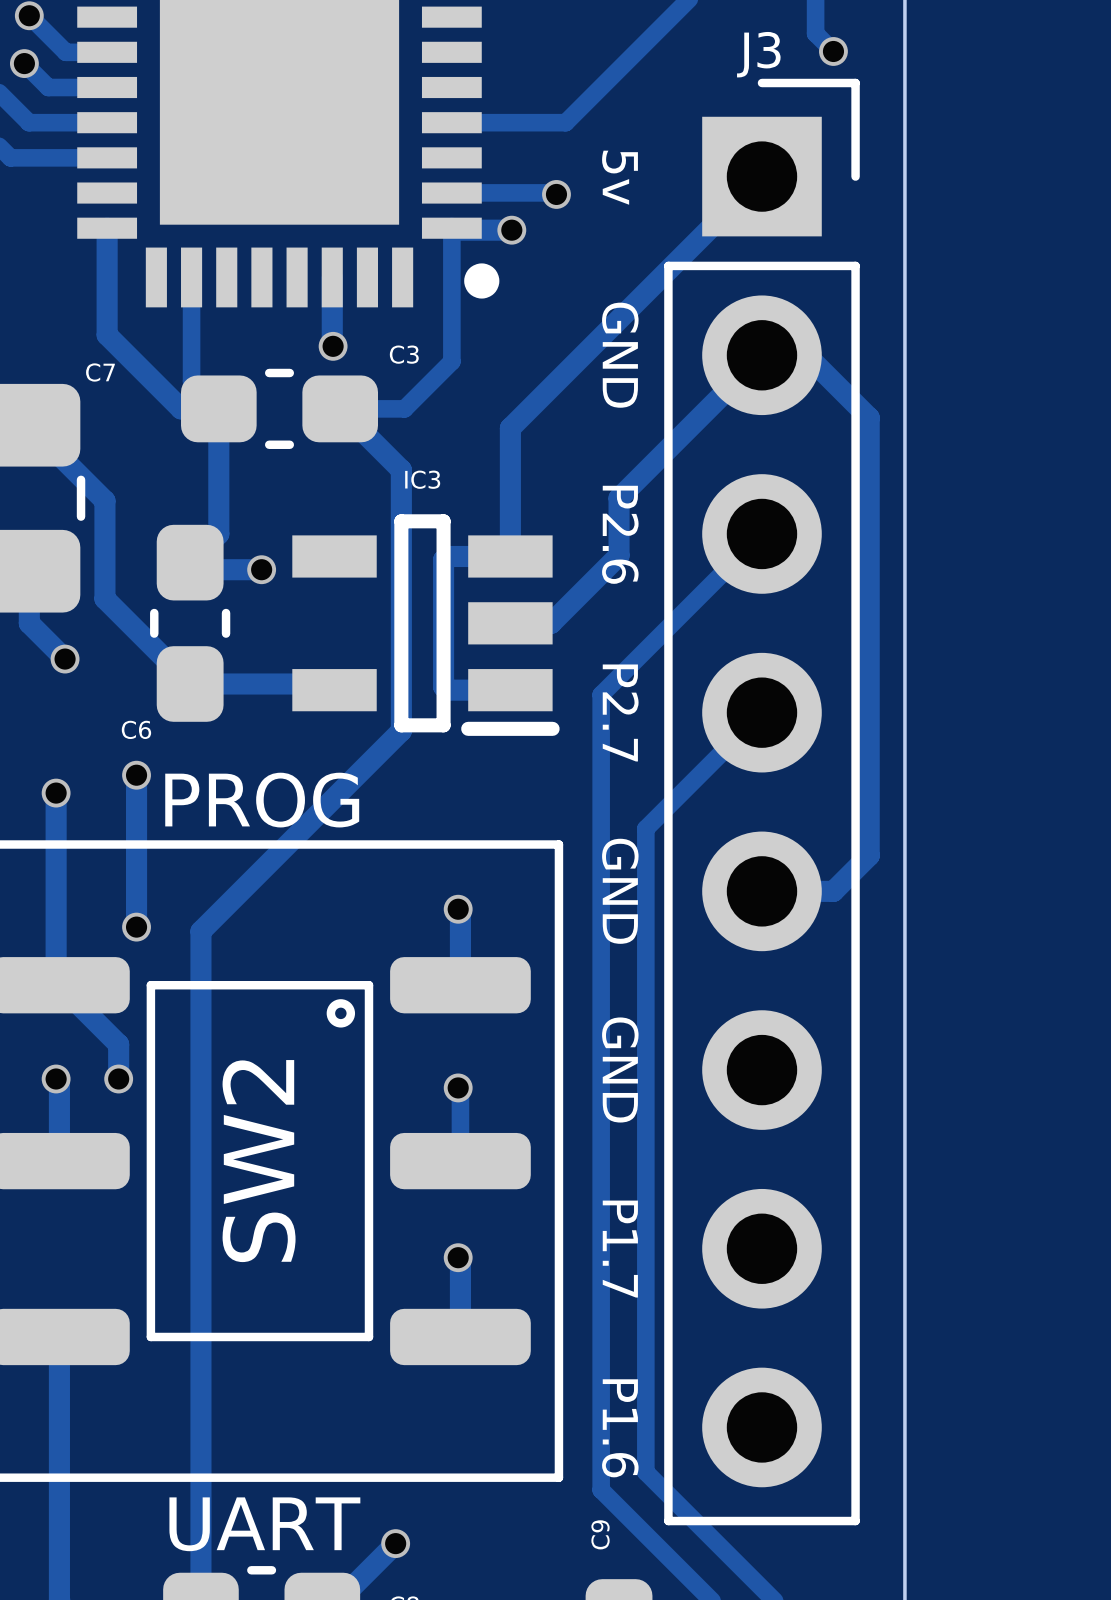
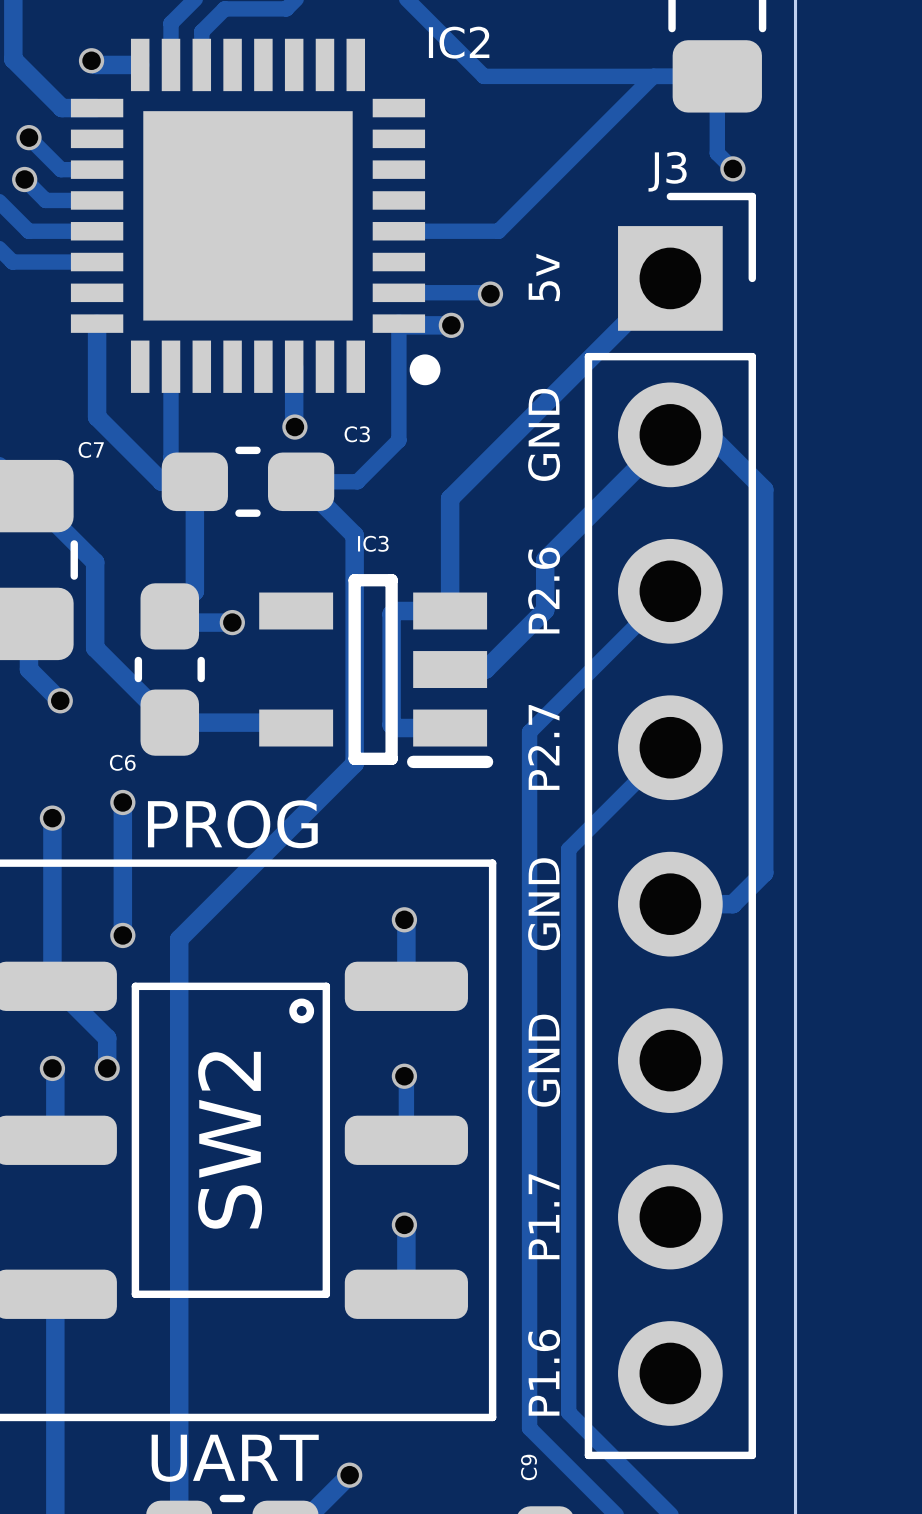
text rotation: 0° (620, 177) -> 180° (544, 277)
text rotation: 0° (620, 355) -> 180° (544, 434)
text rotation: 0° (620, 534) -> 180° (544, 590)
text rotation: 0° (620, 712) -> 180° (543, 747)
text rotation: 0° (620, 891) -> 180° (544, 904)
text rotation: 0° (620, 1069) -> 180° (544, 1060)
text rotation: 0° (620, 1249) -> 180° (544, 1216)
text rotation: 0° (620, 1428) -> 180° (544, 1372)

